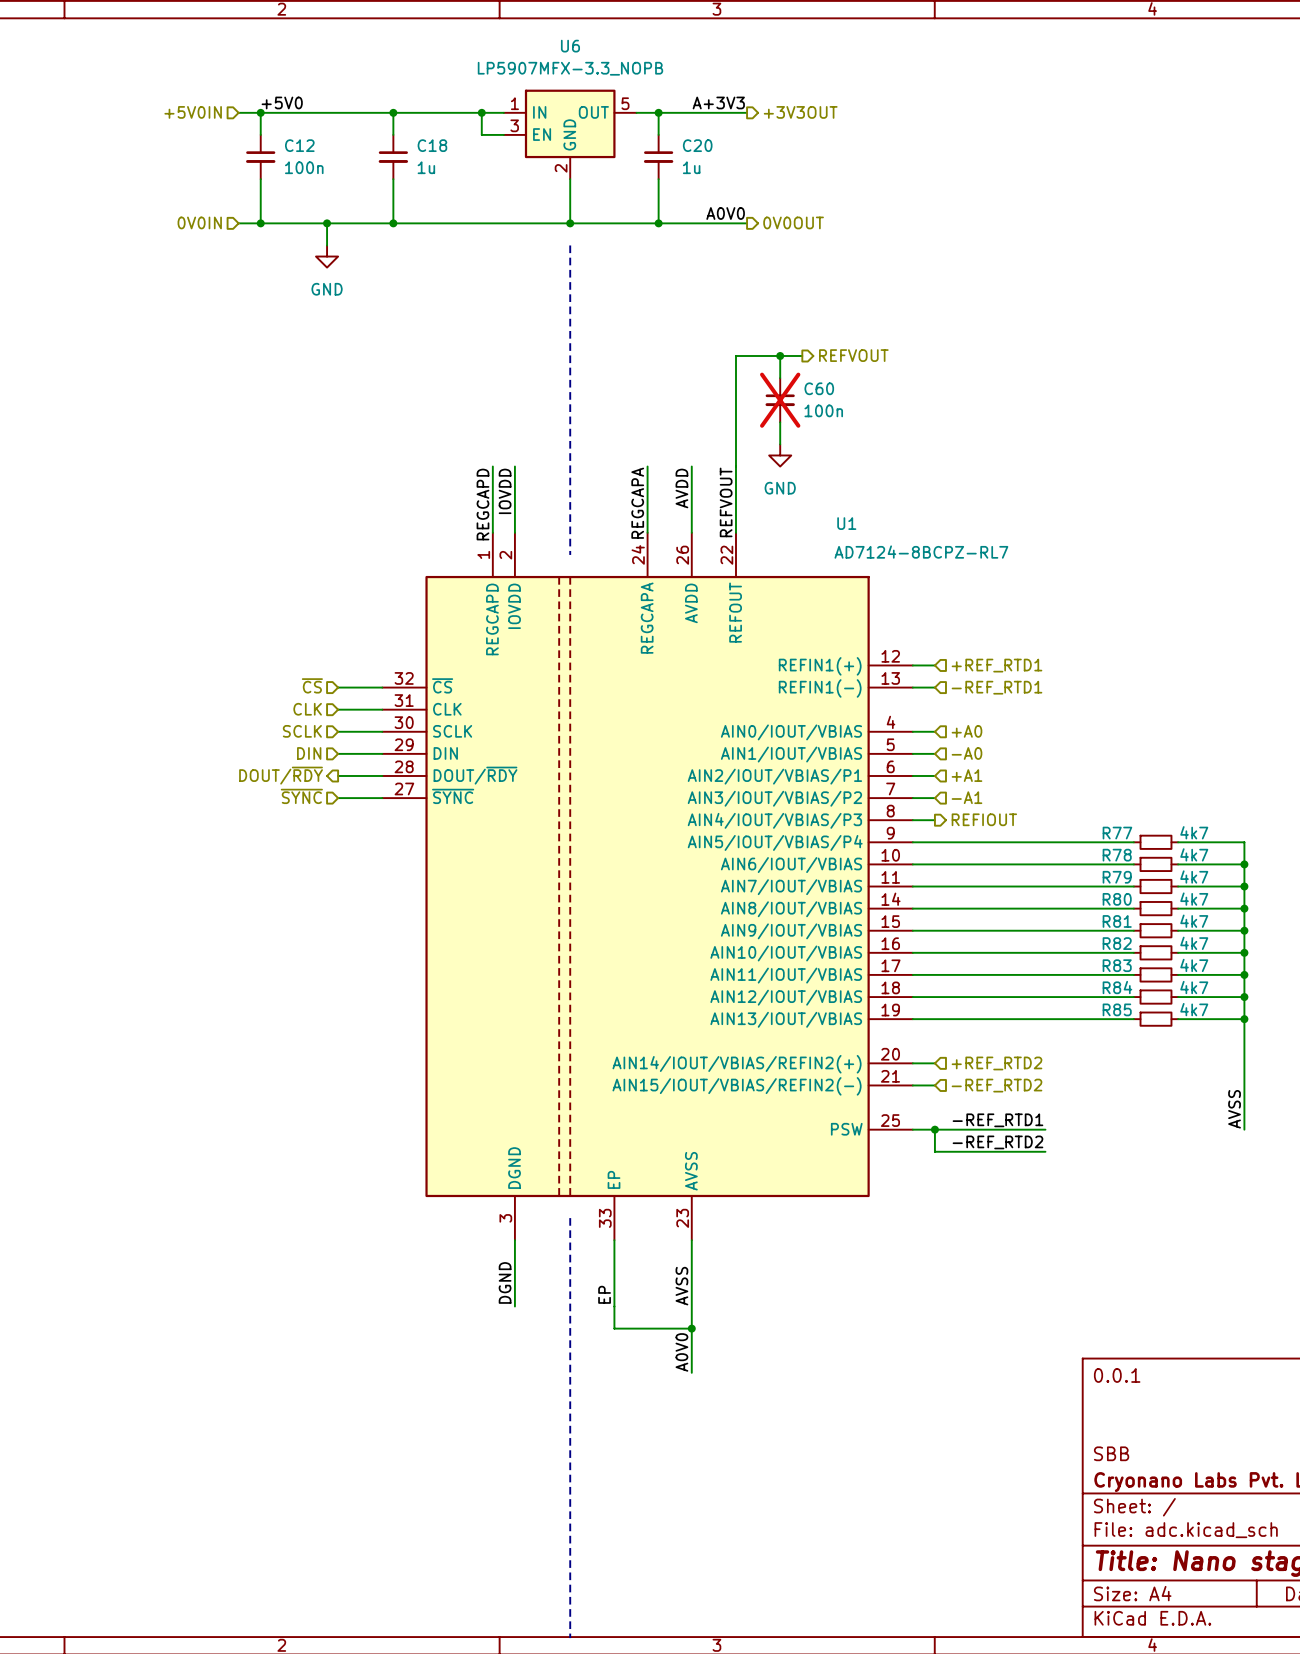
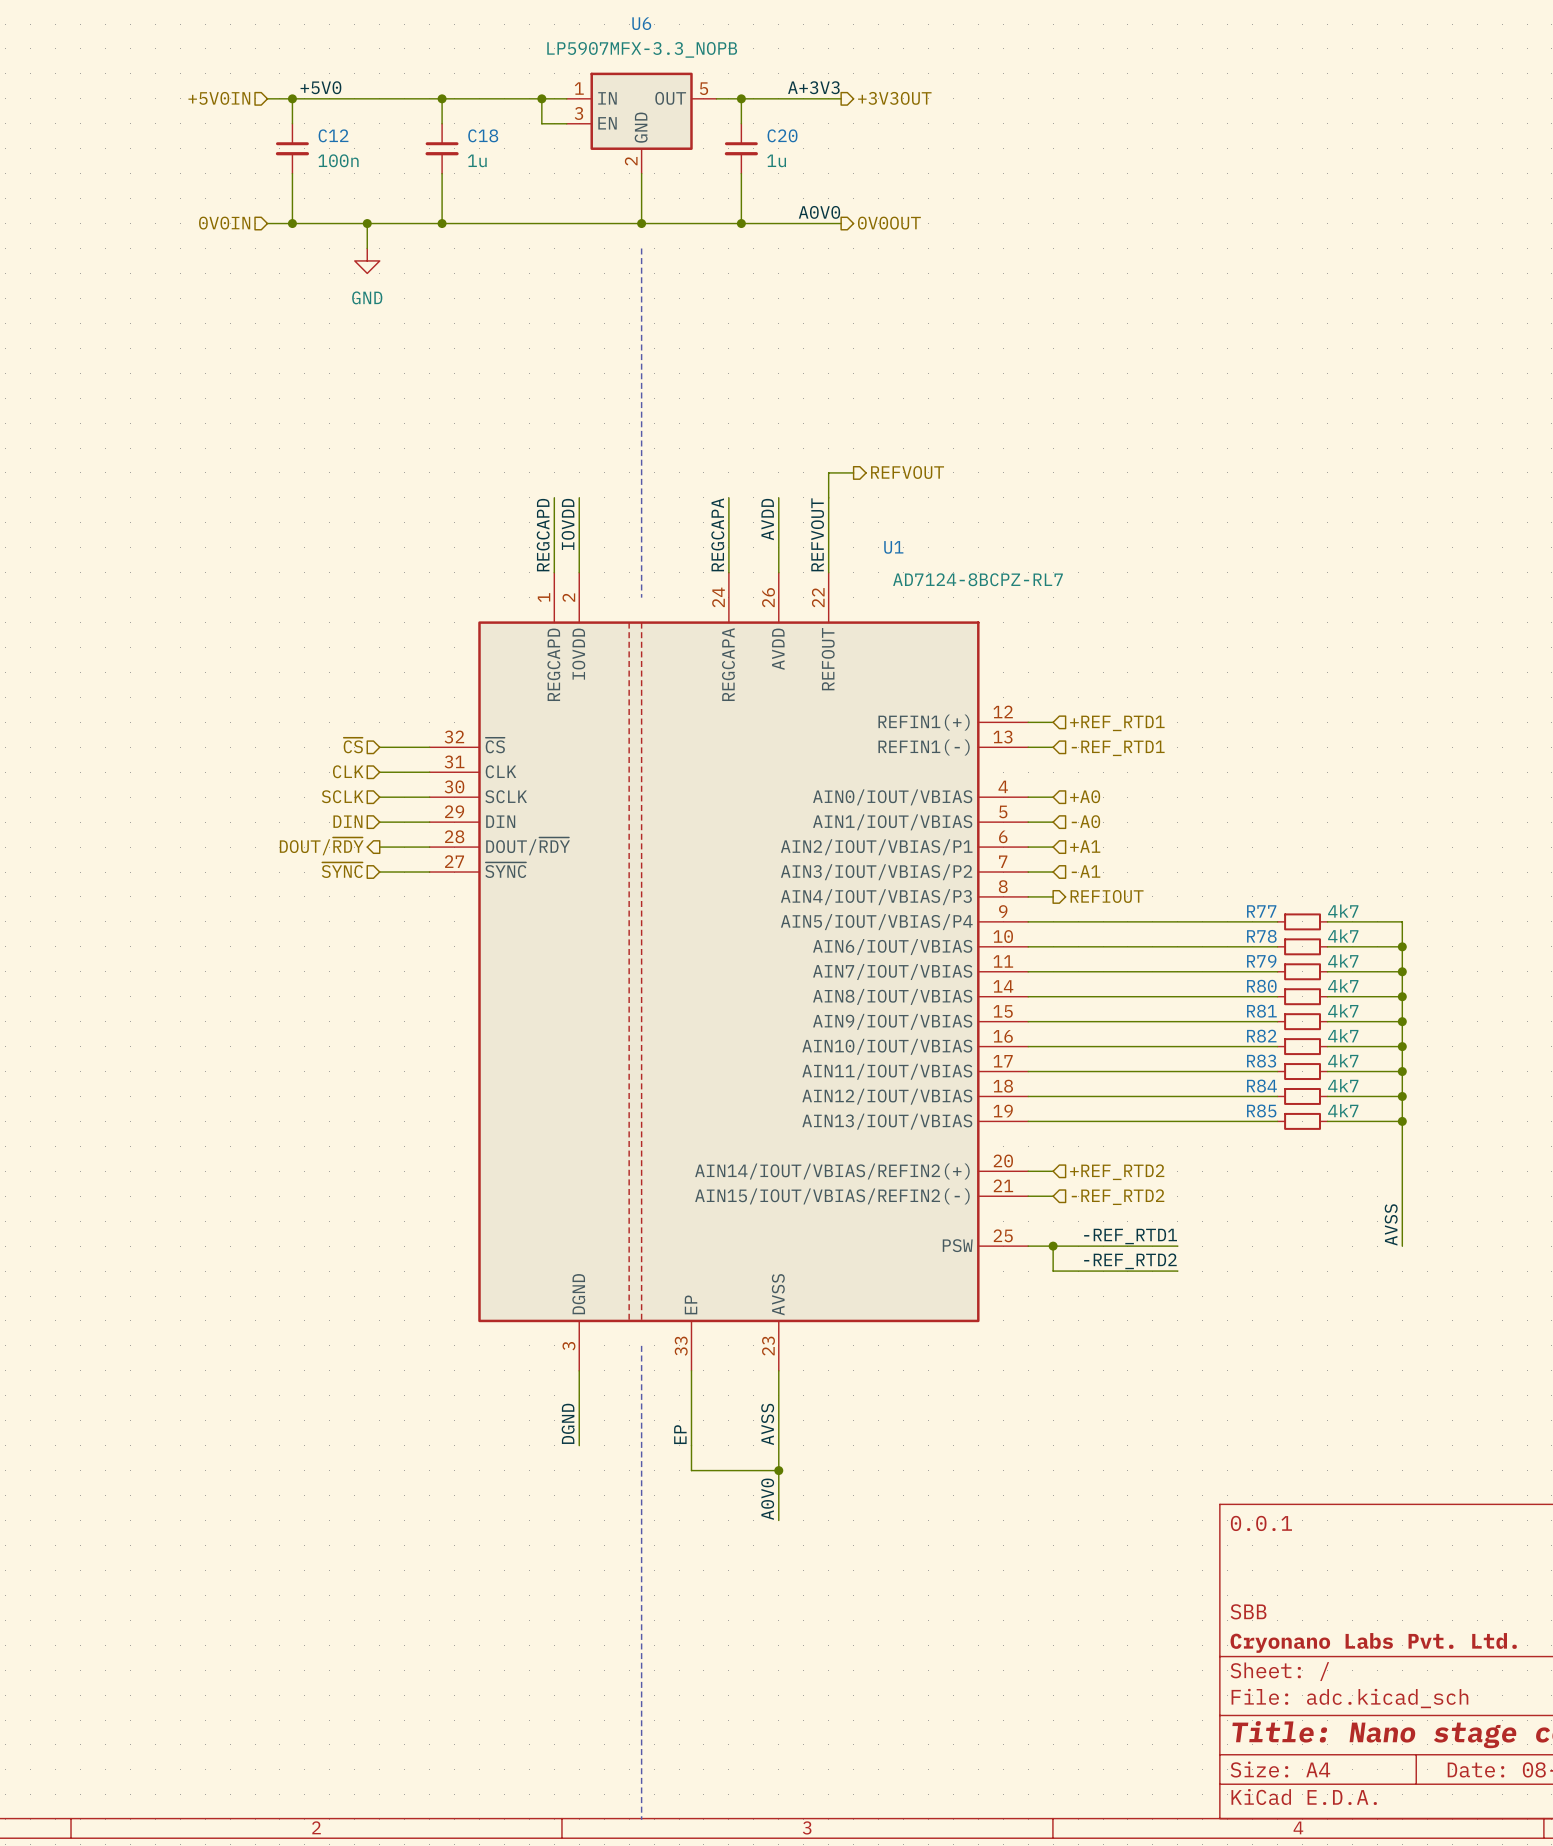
wire: (780, 355) (780, 378) -> none
junction: (780, 355) -> none
wire: (802, 355) (735, 355) (735, 444) -> (853, 472) (828, 472)
hierarchical label position: REFVOUT (853, 355) -> REFVOUT (907, 472)
C60: 100n (780, 400) -> none
wire: (780, 422) (780, 444) -> none
power symbol: GND (780, 455) -> none
U1 name position: U1 (846, 523) -> U1 (893, 547)
U1 value position: AD7124-8BCPZ-RL7 (921, 552) -> AD7124-8BCPZ-RL7 (977, 579)

